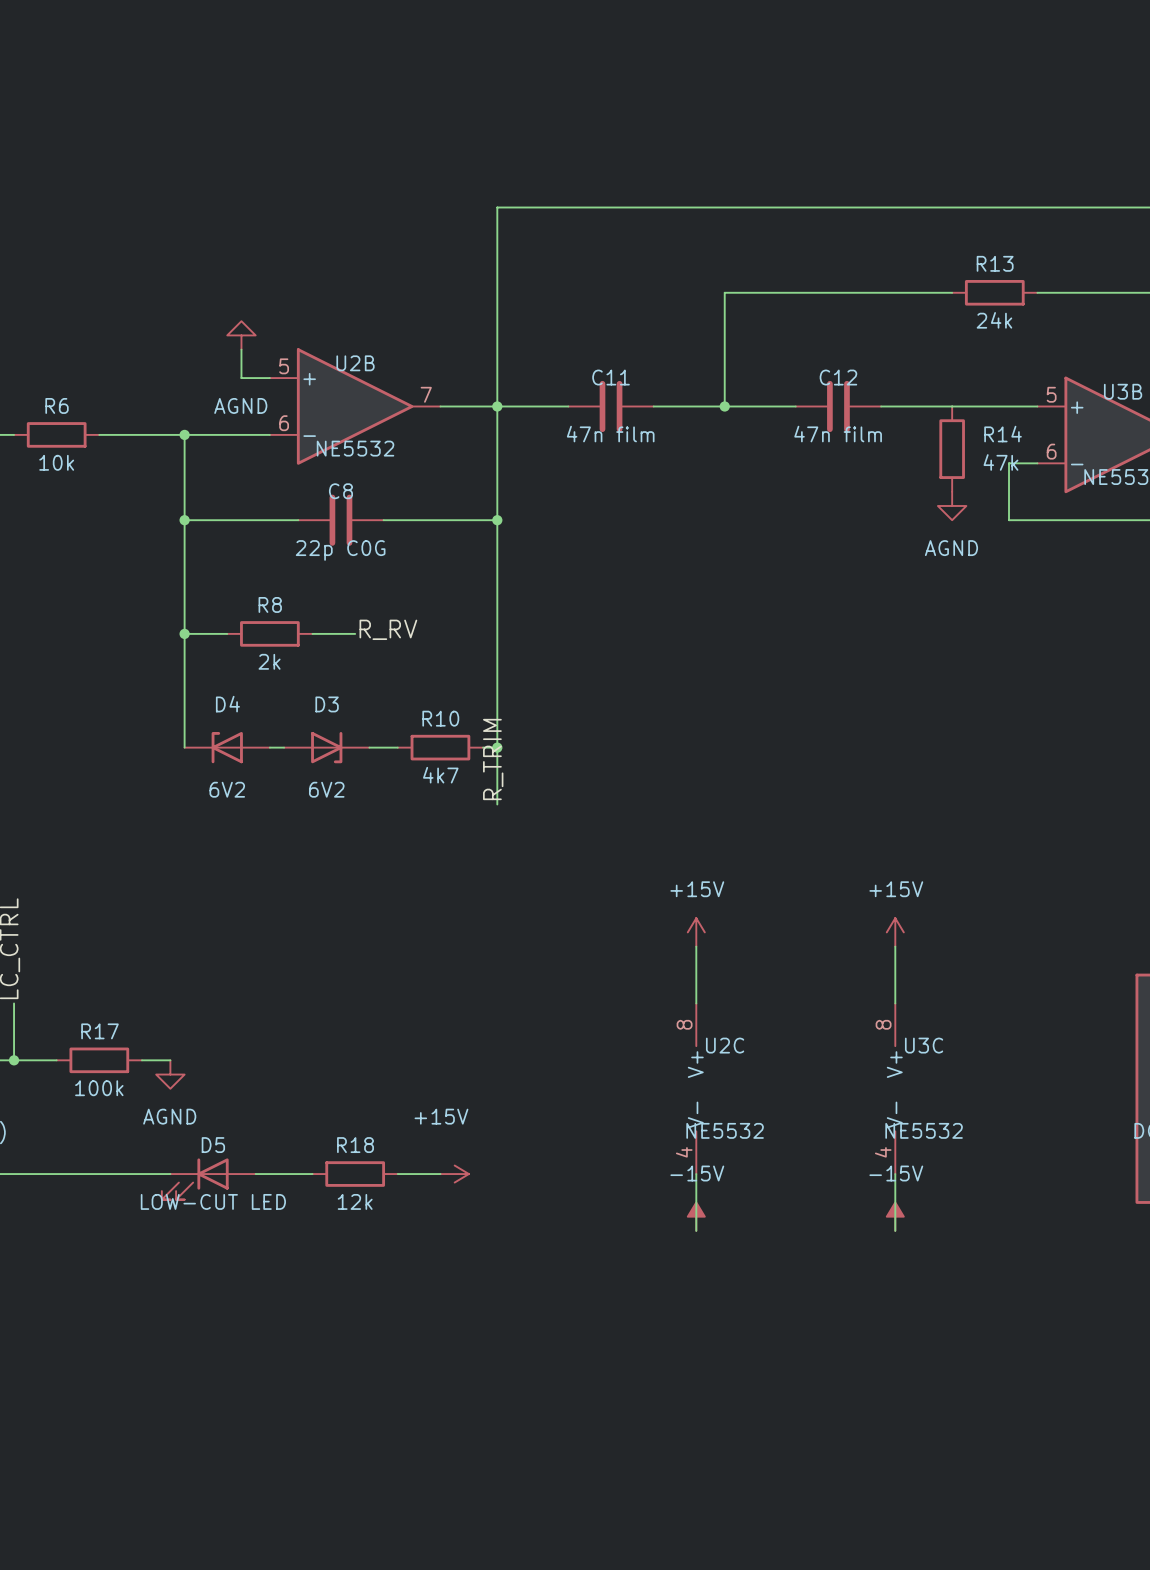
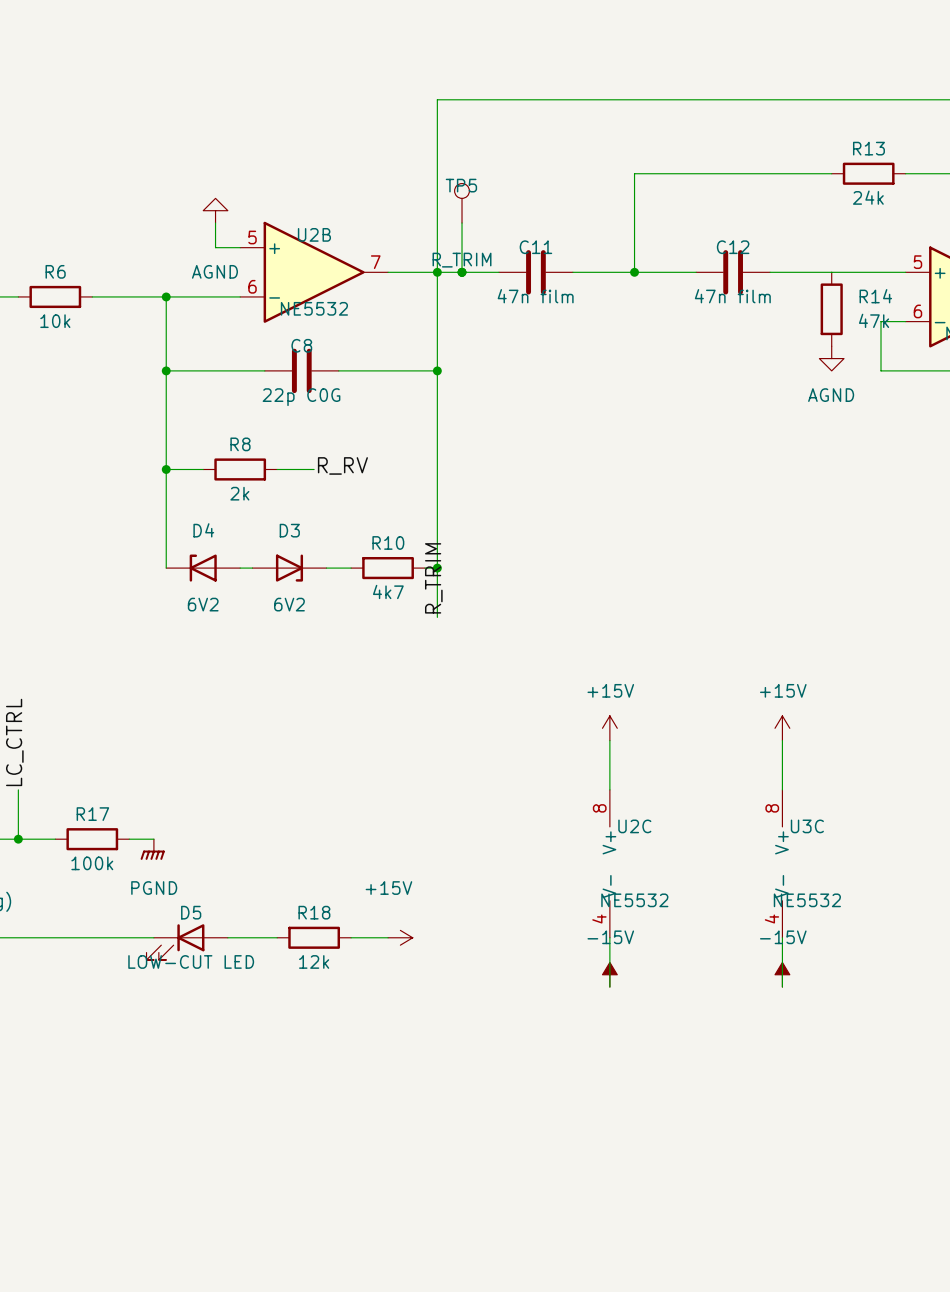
TP5: none -> R_TRIM (462, 203)
wire: none -> (462, 223) (462, 272)
junction: none -> (462, 272)
power symbol: AGND (170, 1074) -> PGND (152, 849)

